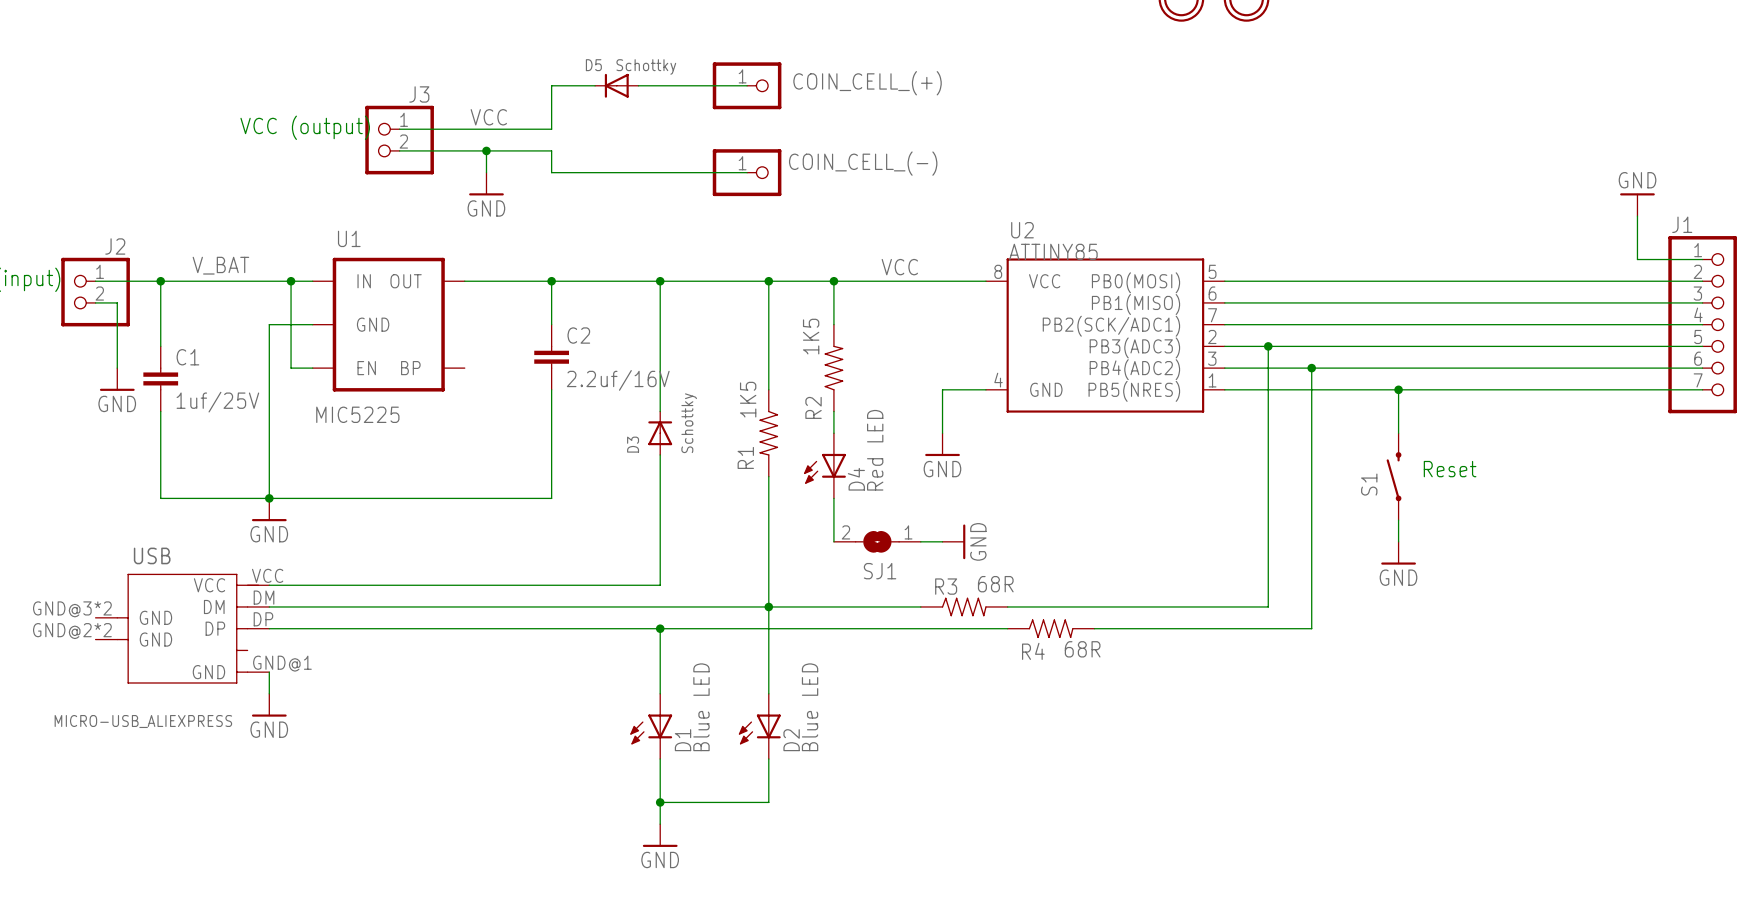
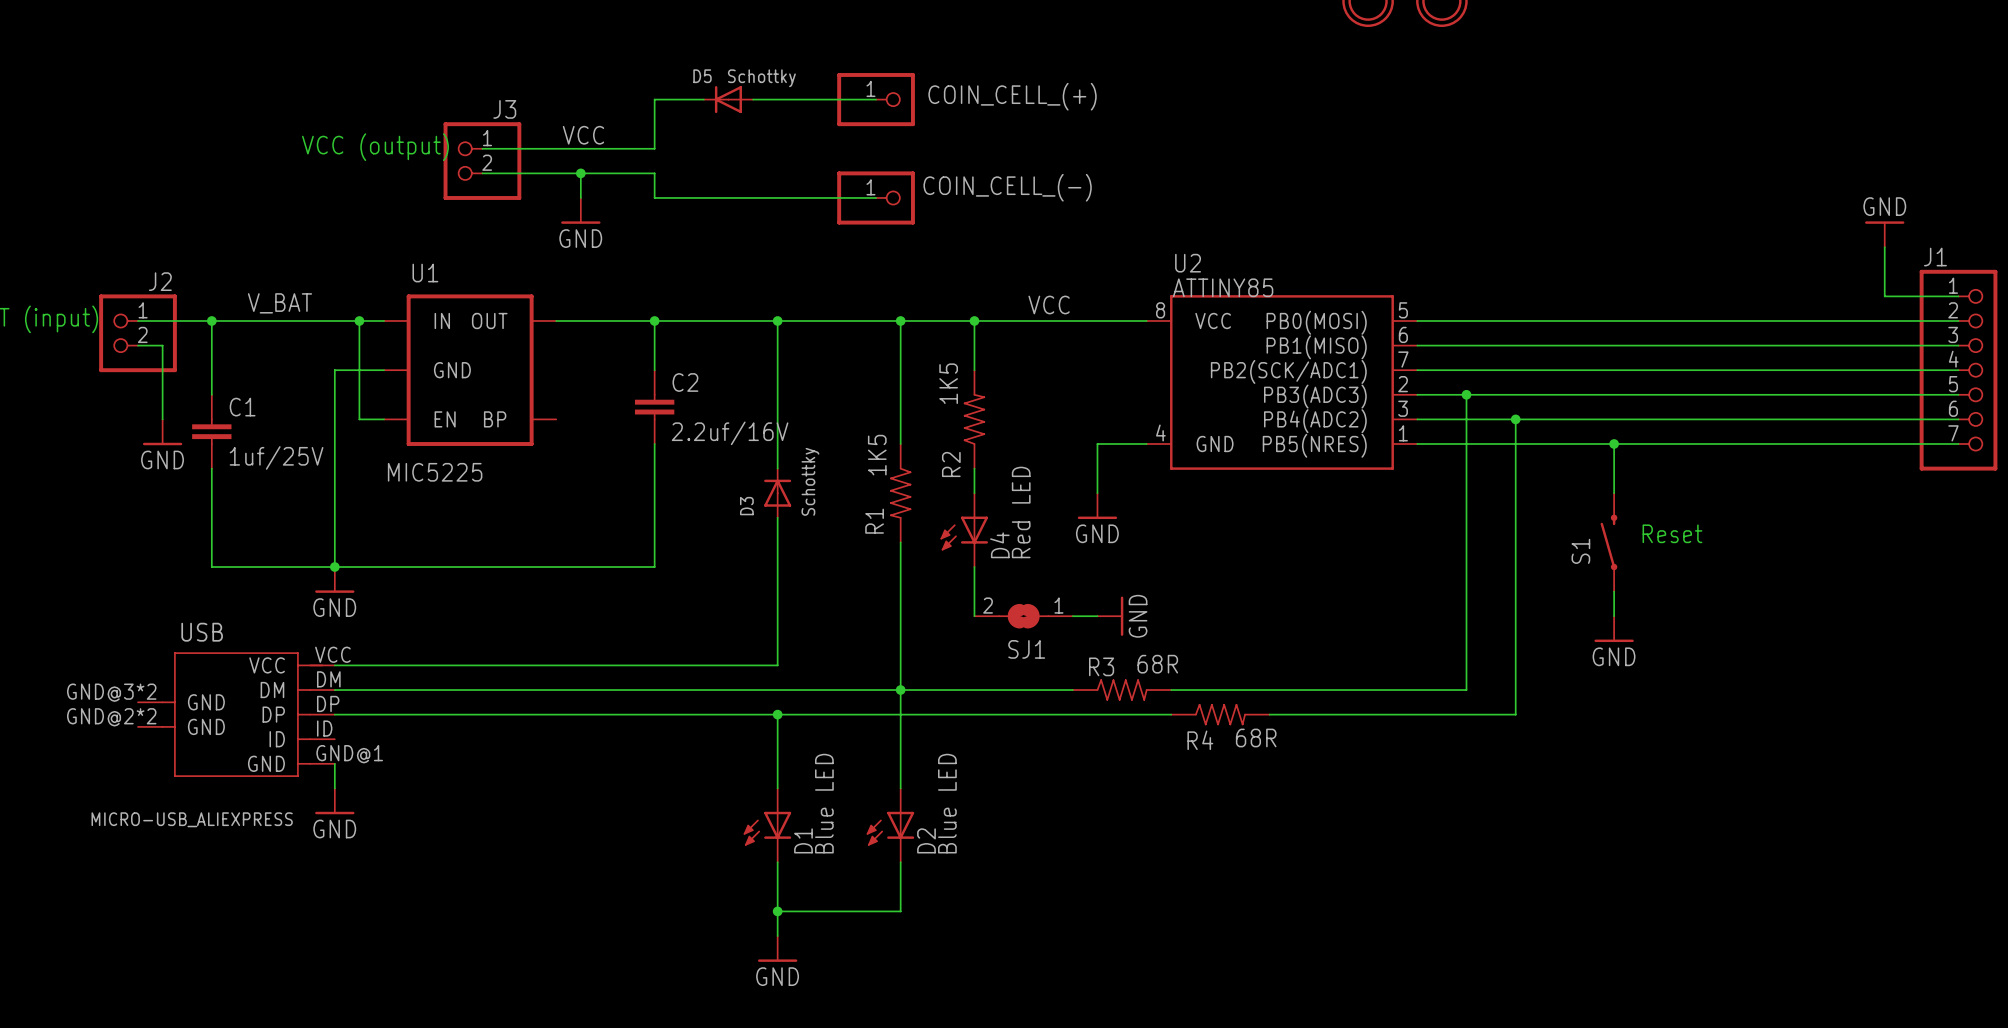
USB symbol: [95, 573, 270, 684] -> [138, 652, 335, 777]

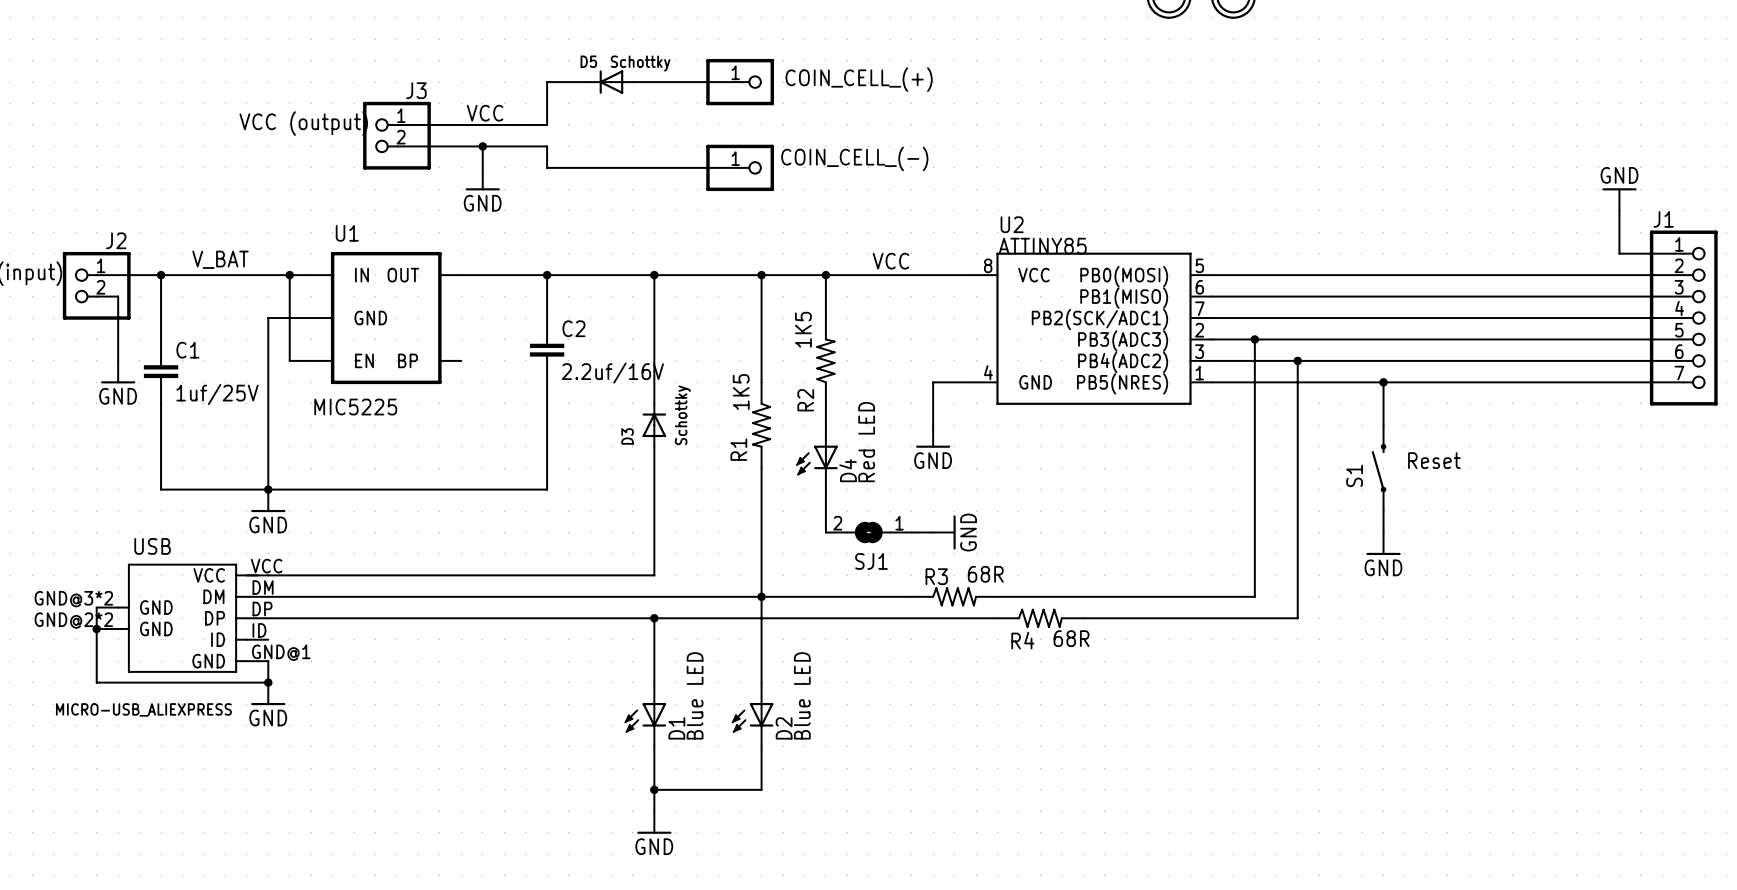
wire: none -> (96, 607) (96, 682) (268, 682)
junction: none -> (96, 629)
junction: none -> (268, 682)

